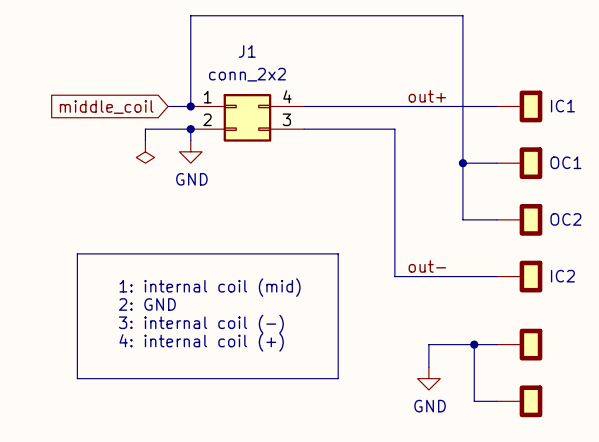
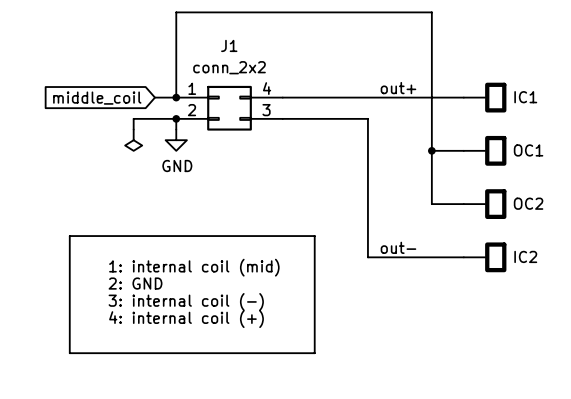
wire: (474, 344) (474, 401) (496, 401) -> none
junction: (474, 344) -> none
wire: (496, 344) (428, 344) (428, 367) -> none
part: (519, 344) -> none
power symbol: GND (428, 378) -> none
part: (519, 401) -> none

